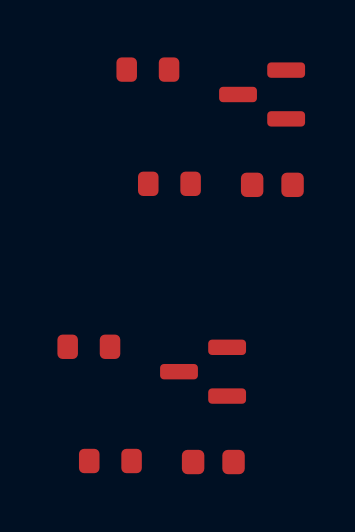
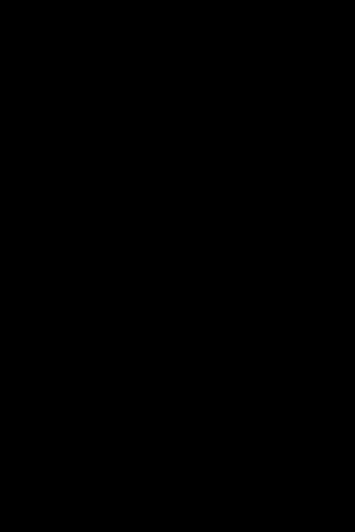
part: (147, 69) -> none
part: (262, 94) -> none
part: (169, 183) -> none
part: (272, 184) -> none
part: (88, 346) -> none
part: (203, 371) -> none
part: (110, 460) -> none
part: (213, 462) -> none

